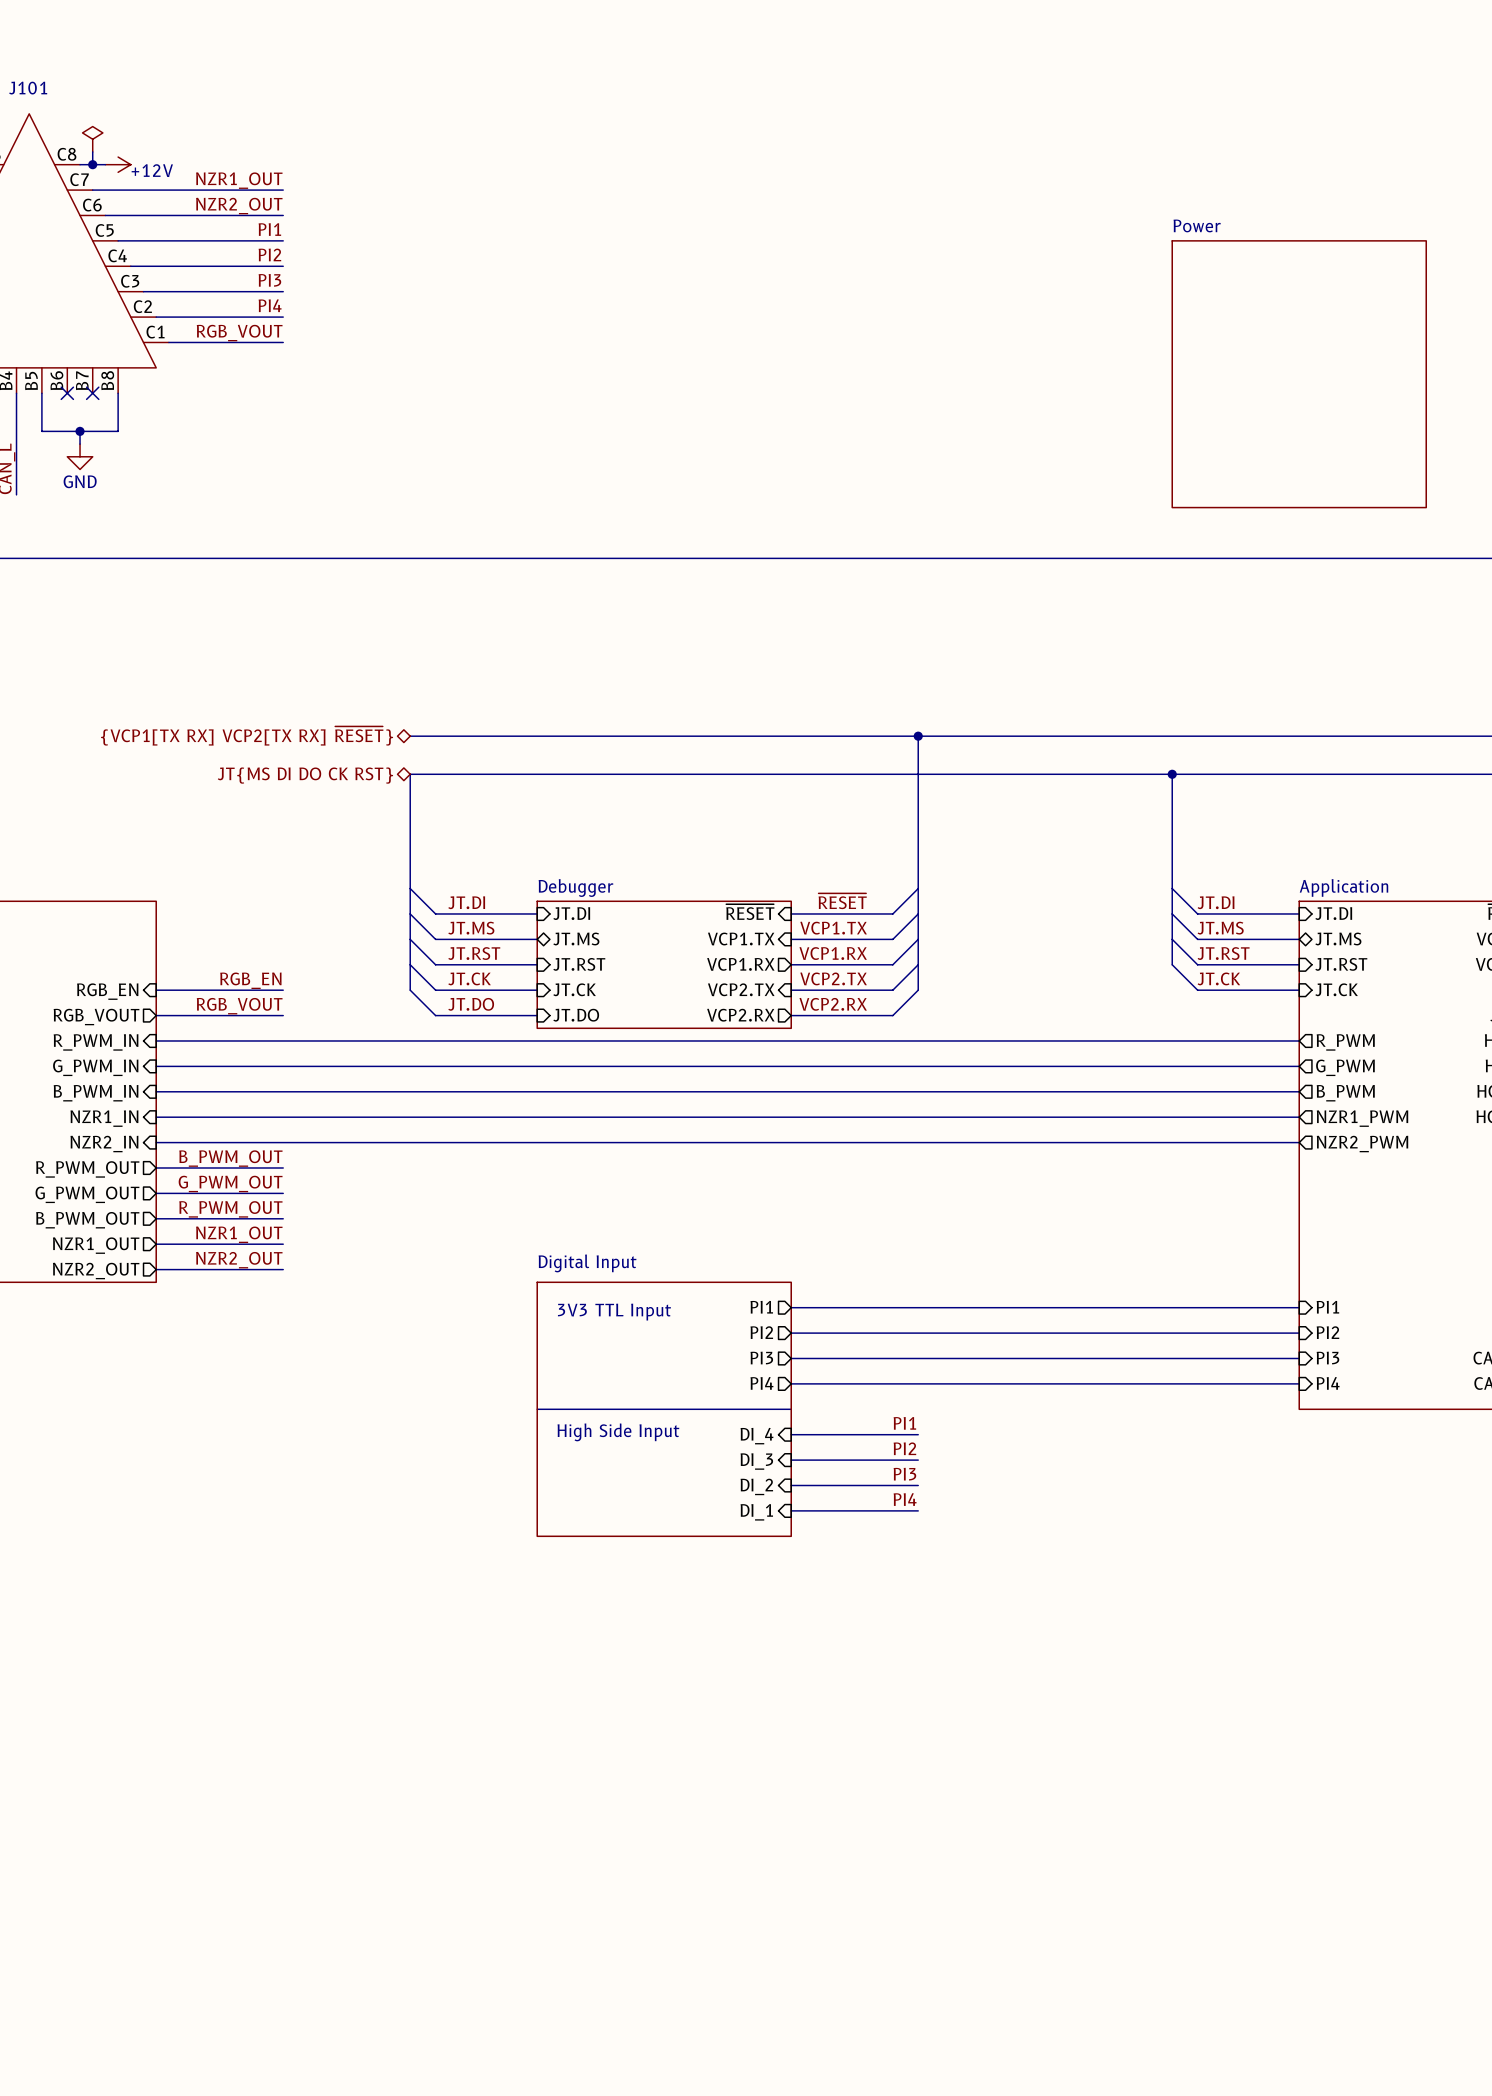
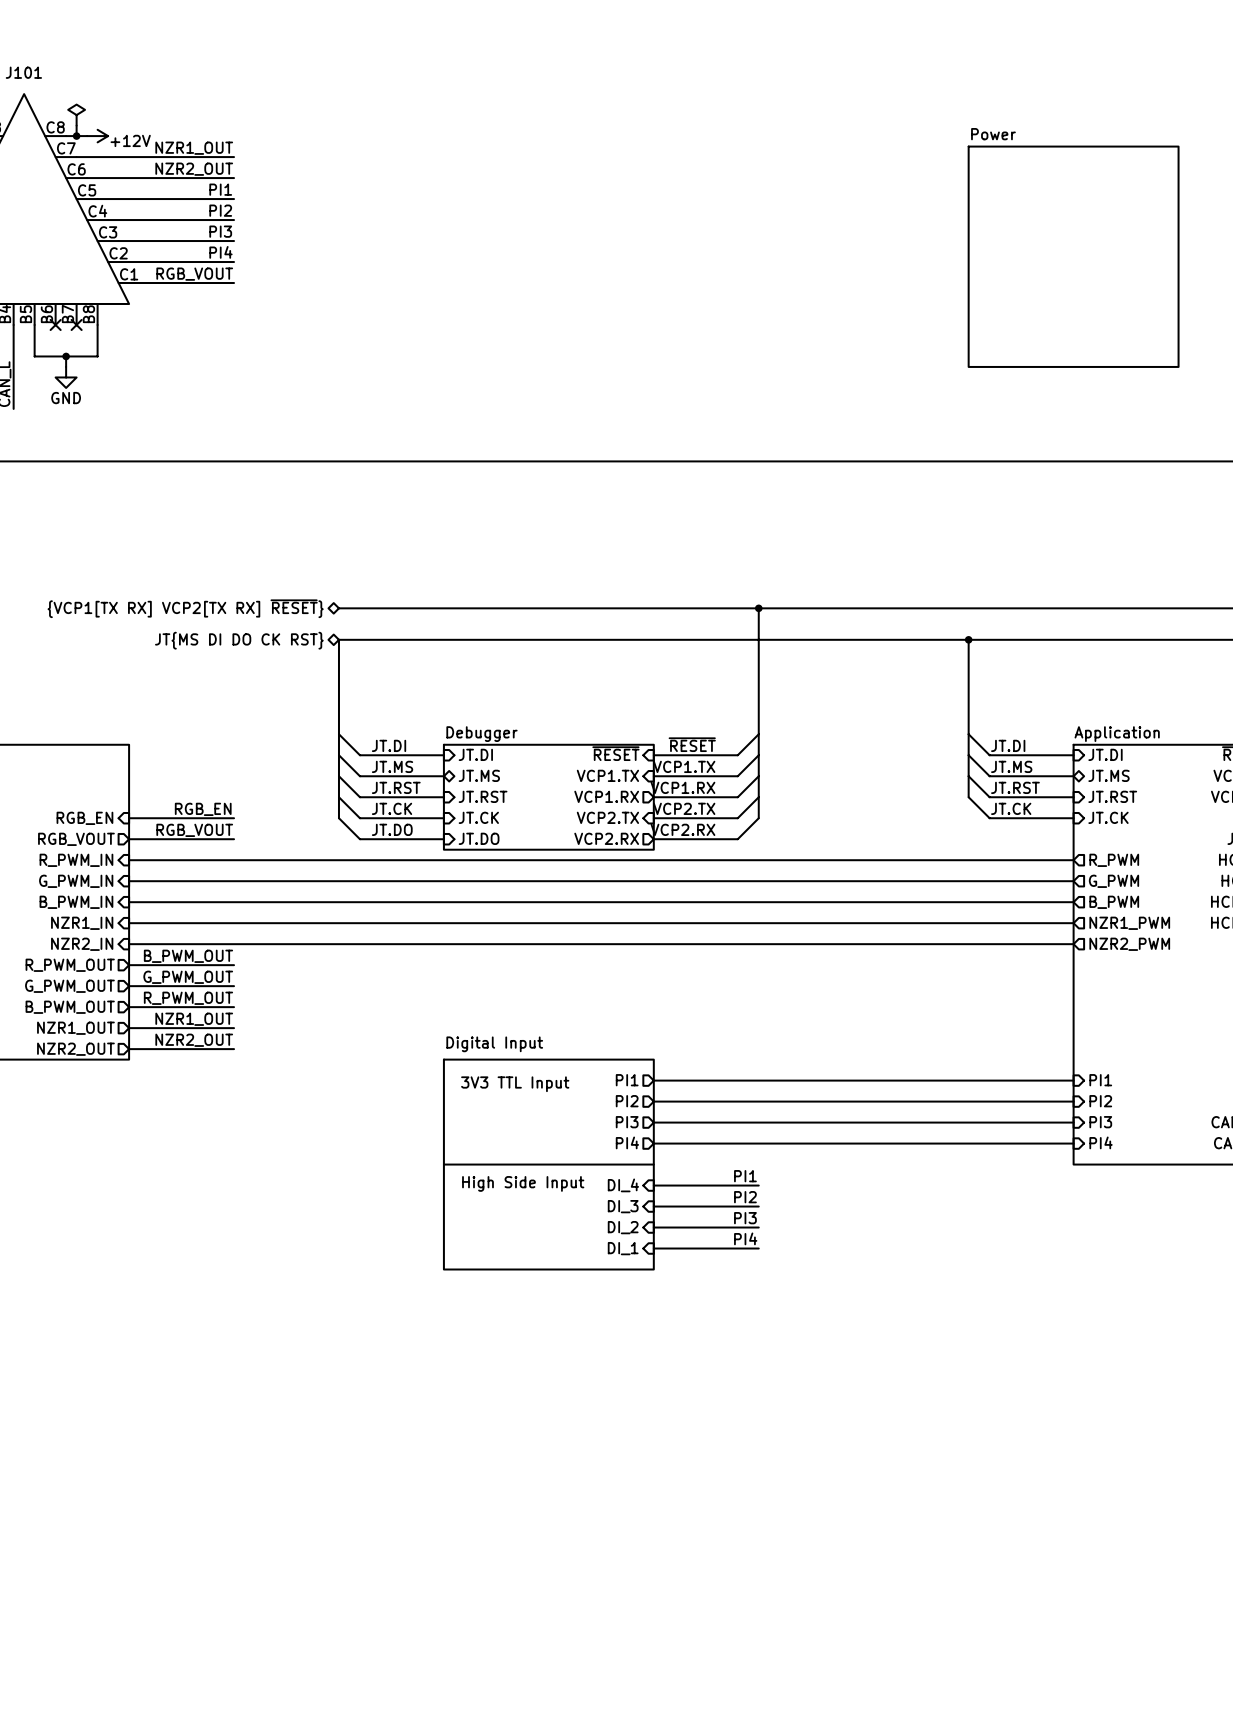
sheet Power position: (1299, 374) -> (1073, 256)

